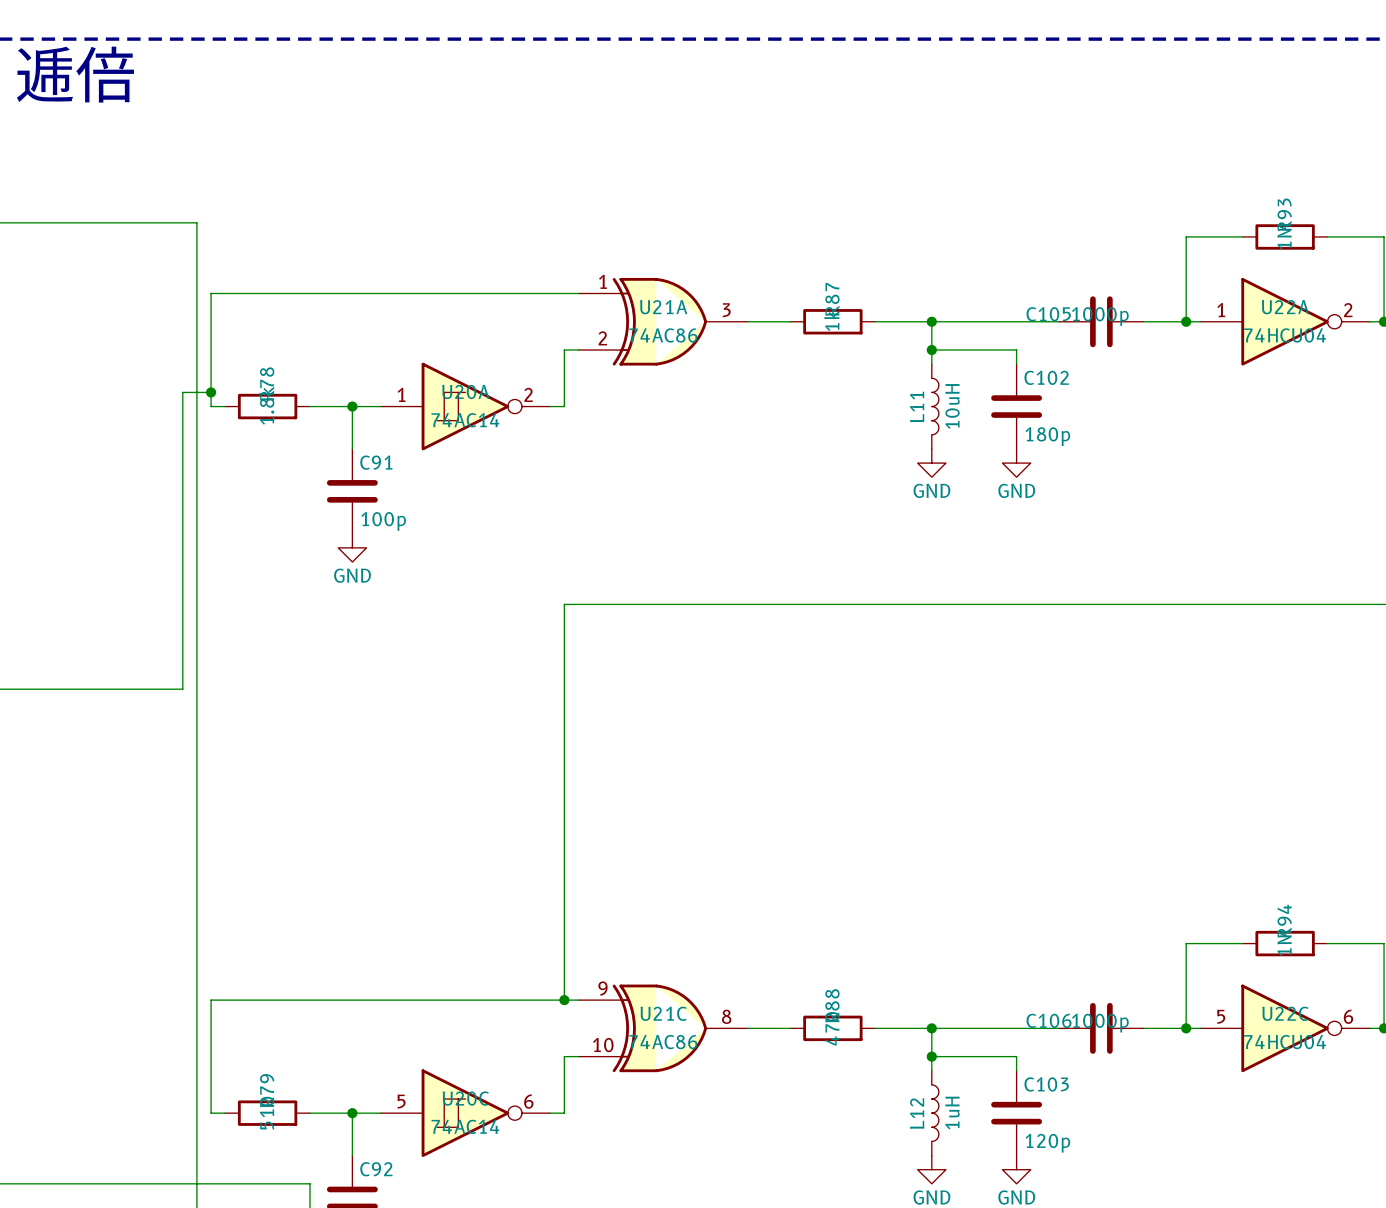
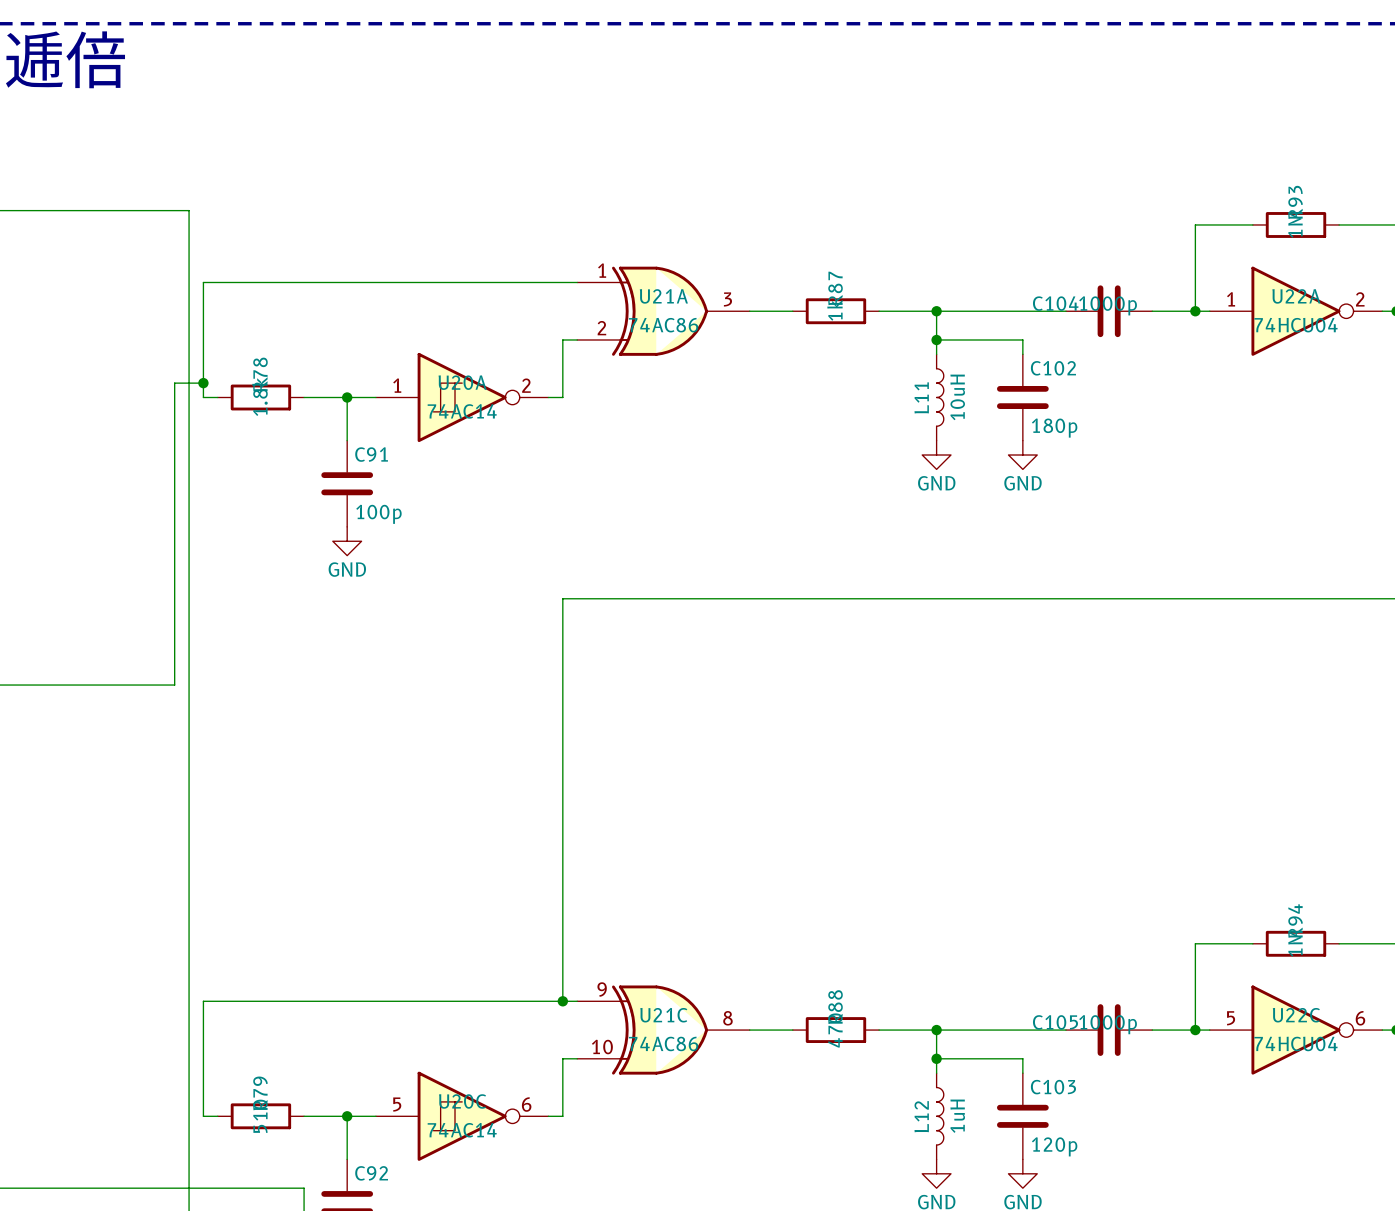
C105 name: C105 (1048, 314) -> C104 (1055, 303)
C106 name: C106 (1049, 1020) -> C105 (1055, 1022)

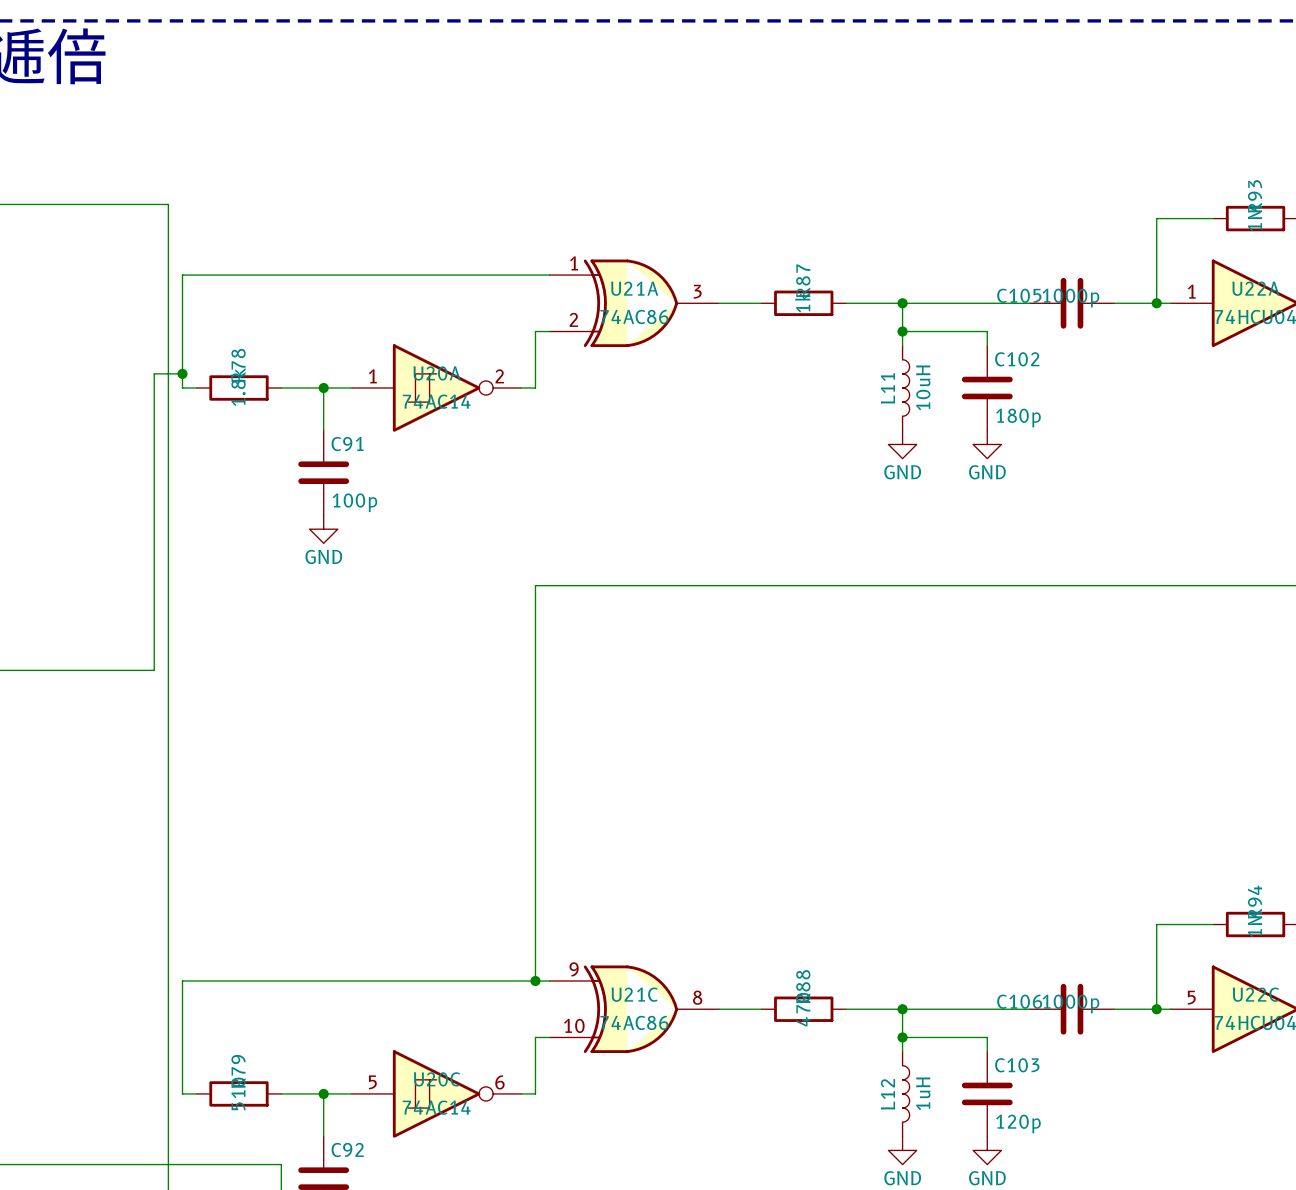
C104 name: C104 (1055, 303) -> C105 (1019, 295)
C105 name: C105 (1055, 1022) -> C106 (1019, 1001)

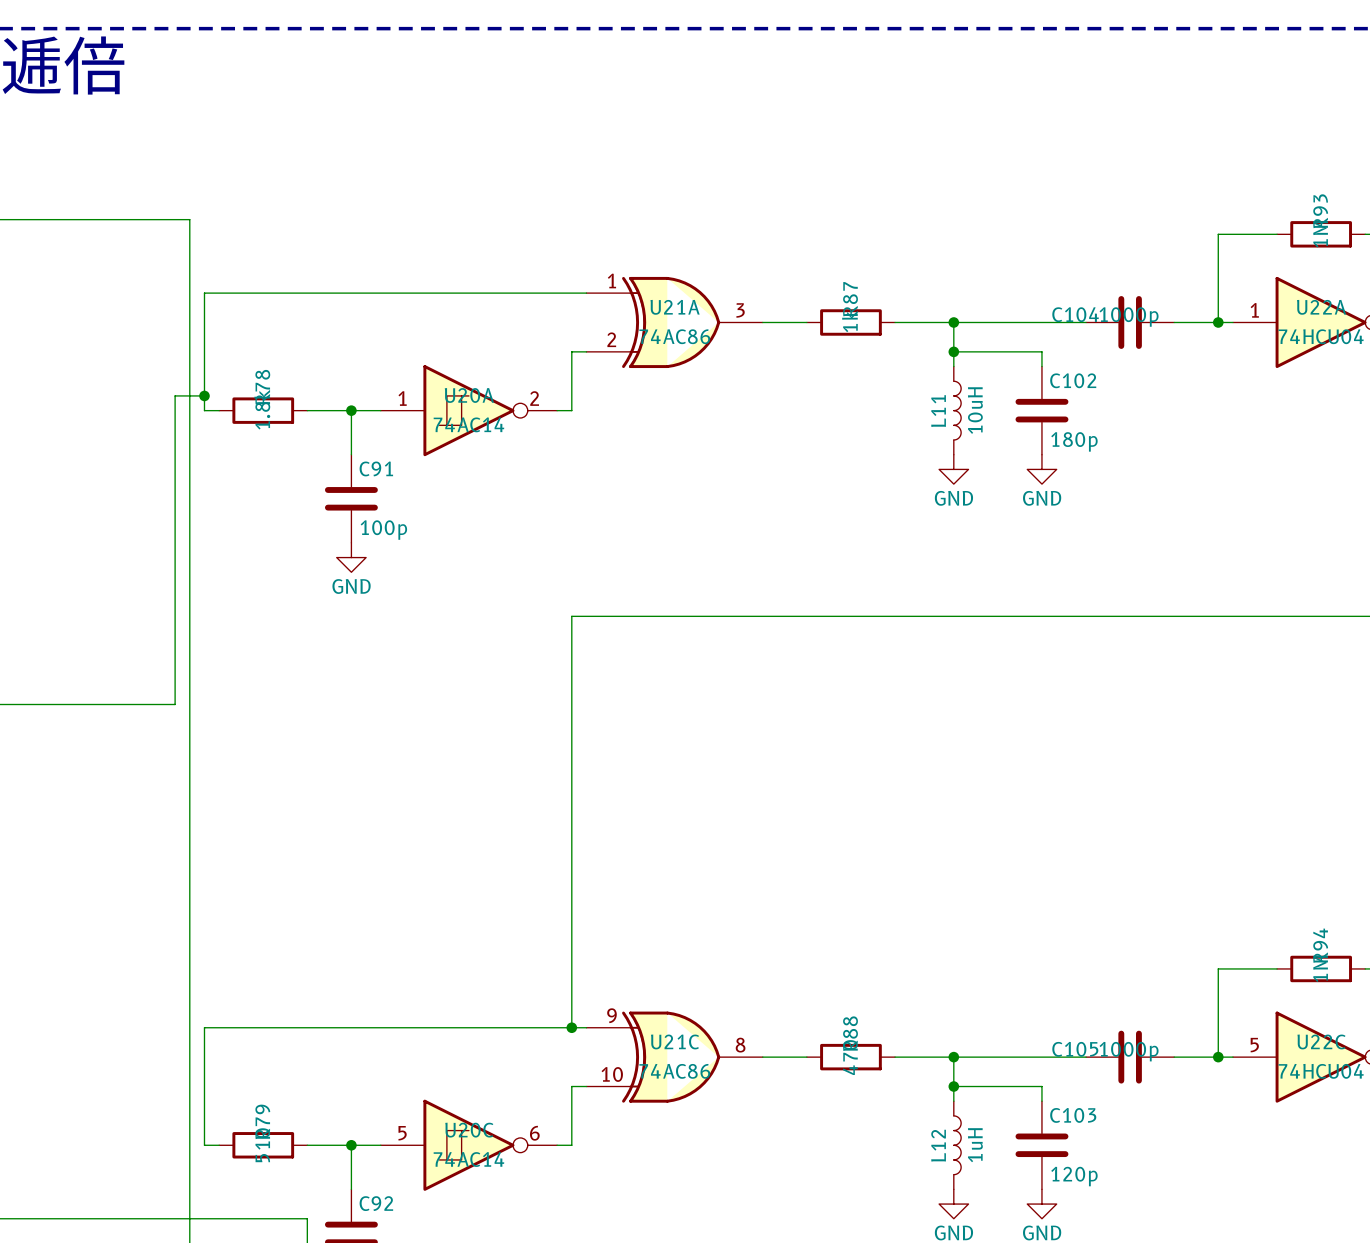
C105 name: C105 (1019, 295) -> C104 (1075, 314)
C106 name: C106 (1019, 1001) -> C105 (1075, 1049)

